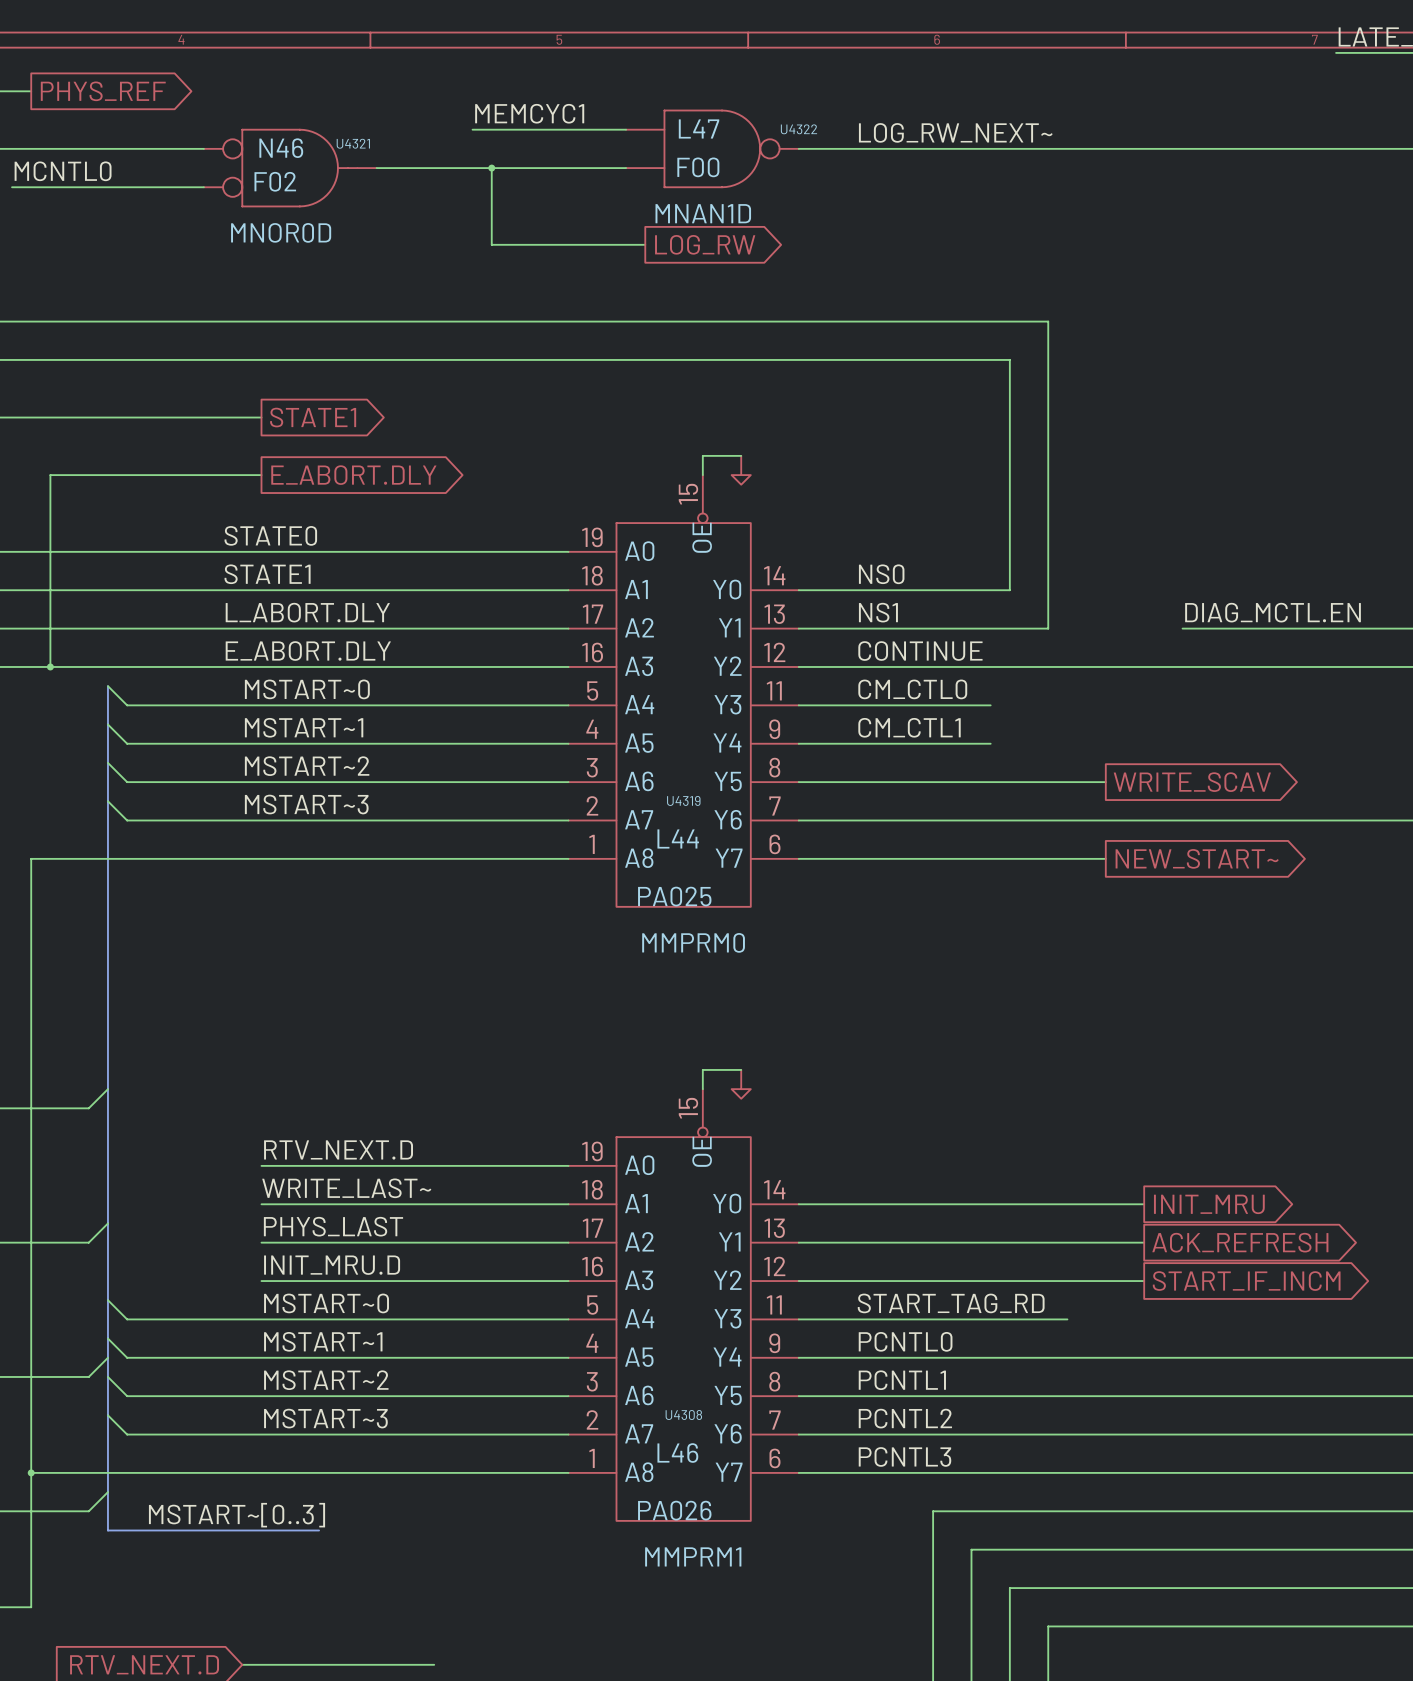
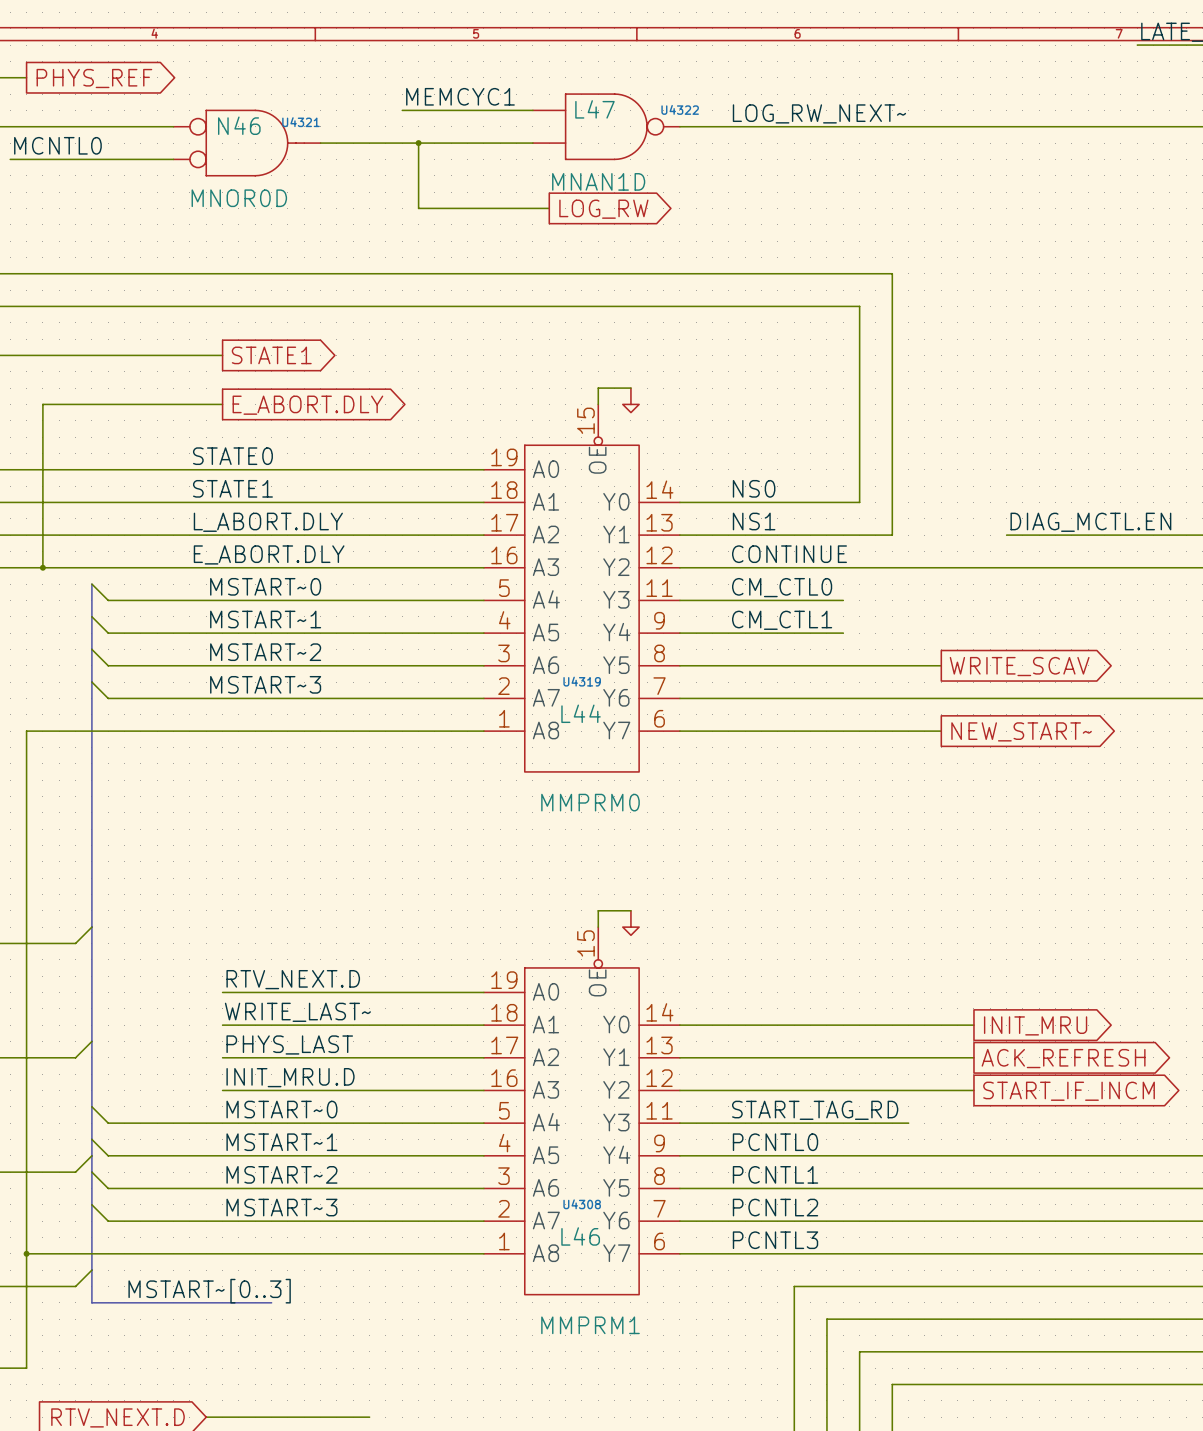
U4322 value: F00 (698, 167) -> none
U4321 value: F02 (275, 181) -> none
U4319 value: PA025 (674, 896) -> none
U4308 value: PA026 (674, 1510) -> none

